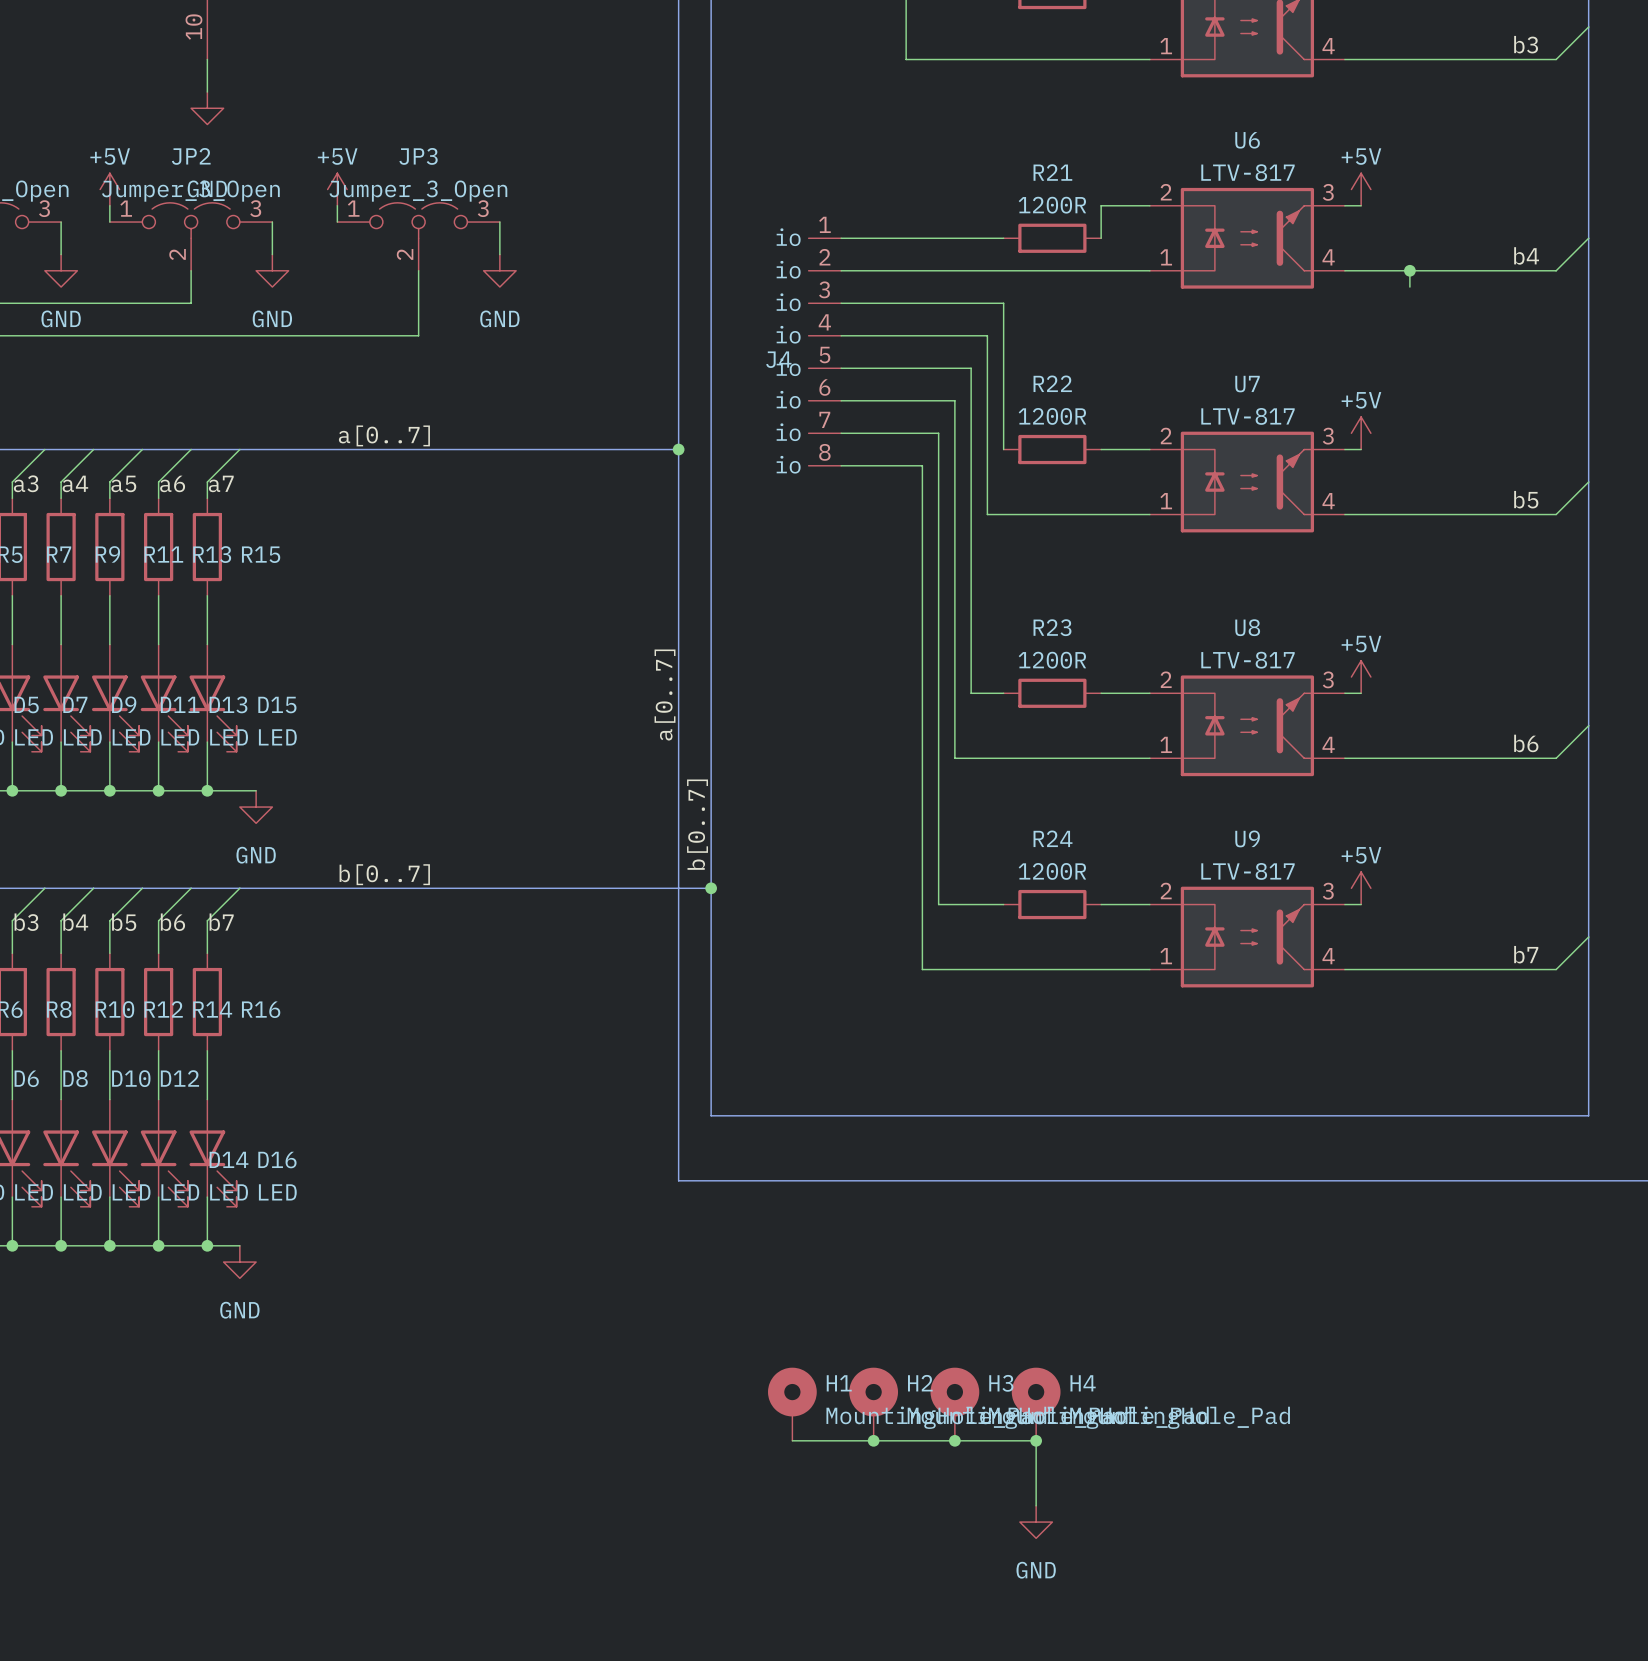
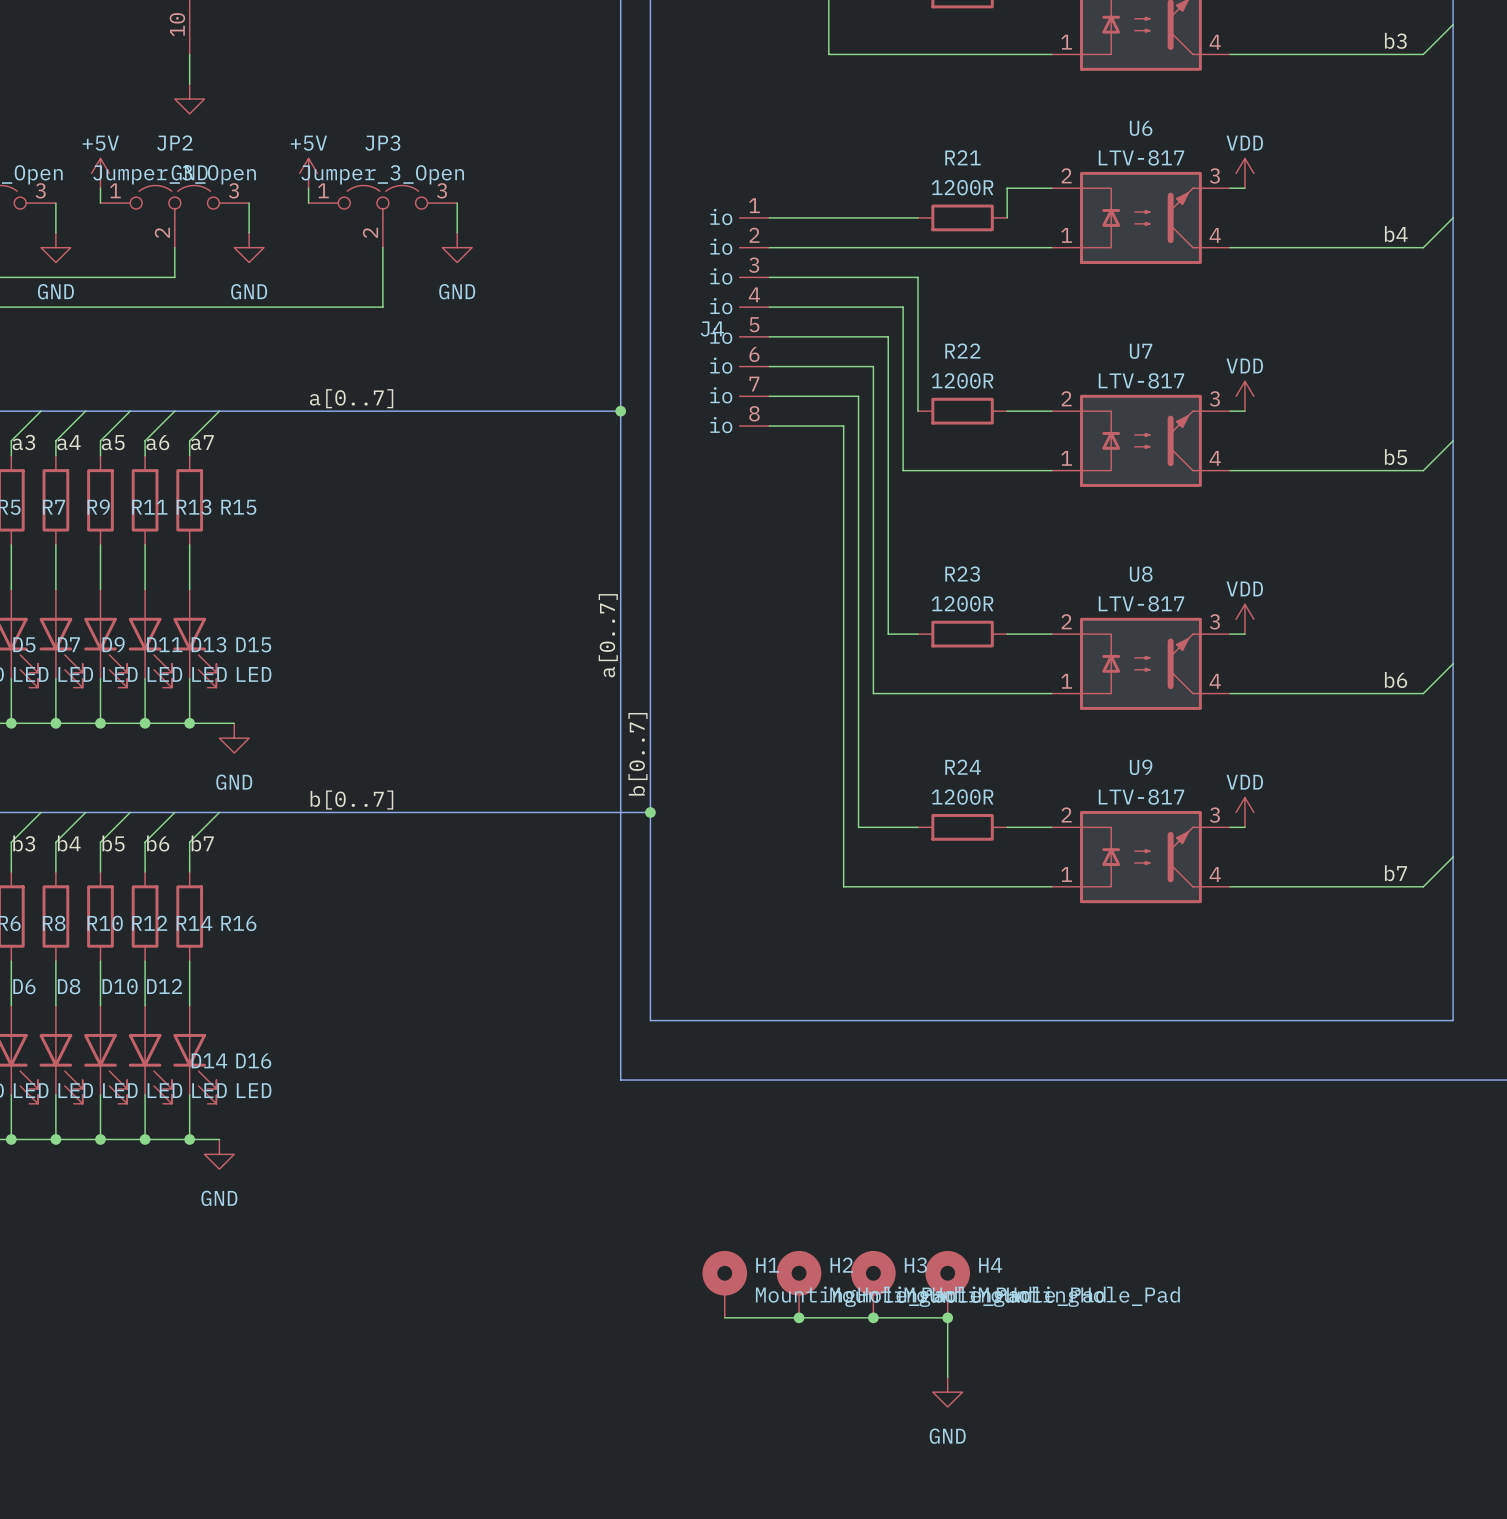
power symbol: +5V (1361, 189) -> VDD (1244, 173)
wire: (1409, 270) (1409, 287) -> none
junction: (1409, 270) -> none
power symbol: +5V (1361, 433) -> VDD (1244, 396)
power symbol: +5V (1361, 677) -> VDD (1244, 619)
power symbol: +5V (1361, 888) -> VDD (1244, 812)

